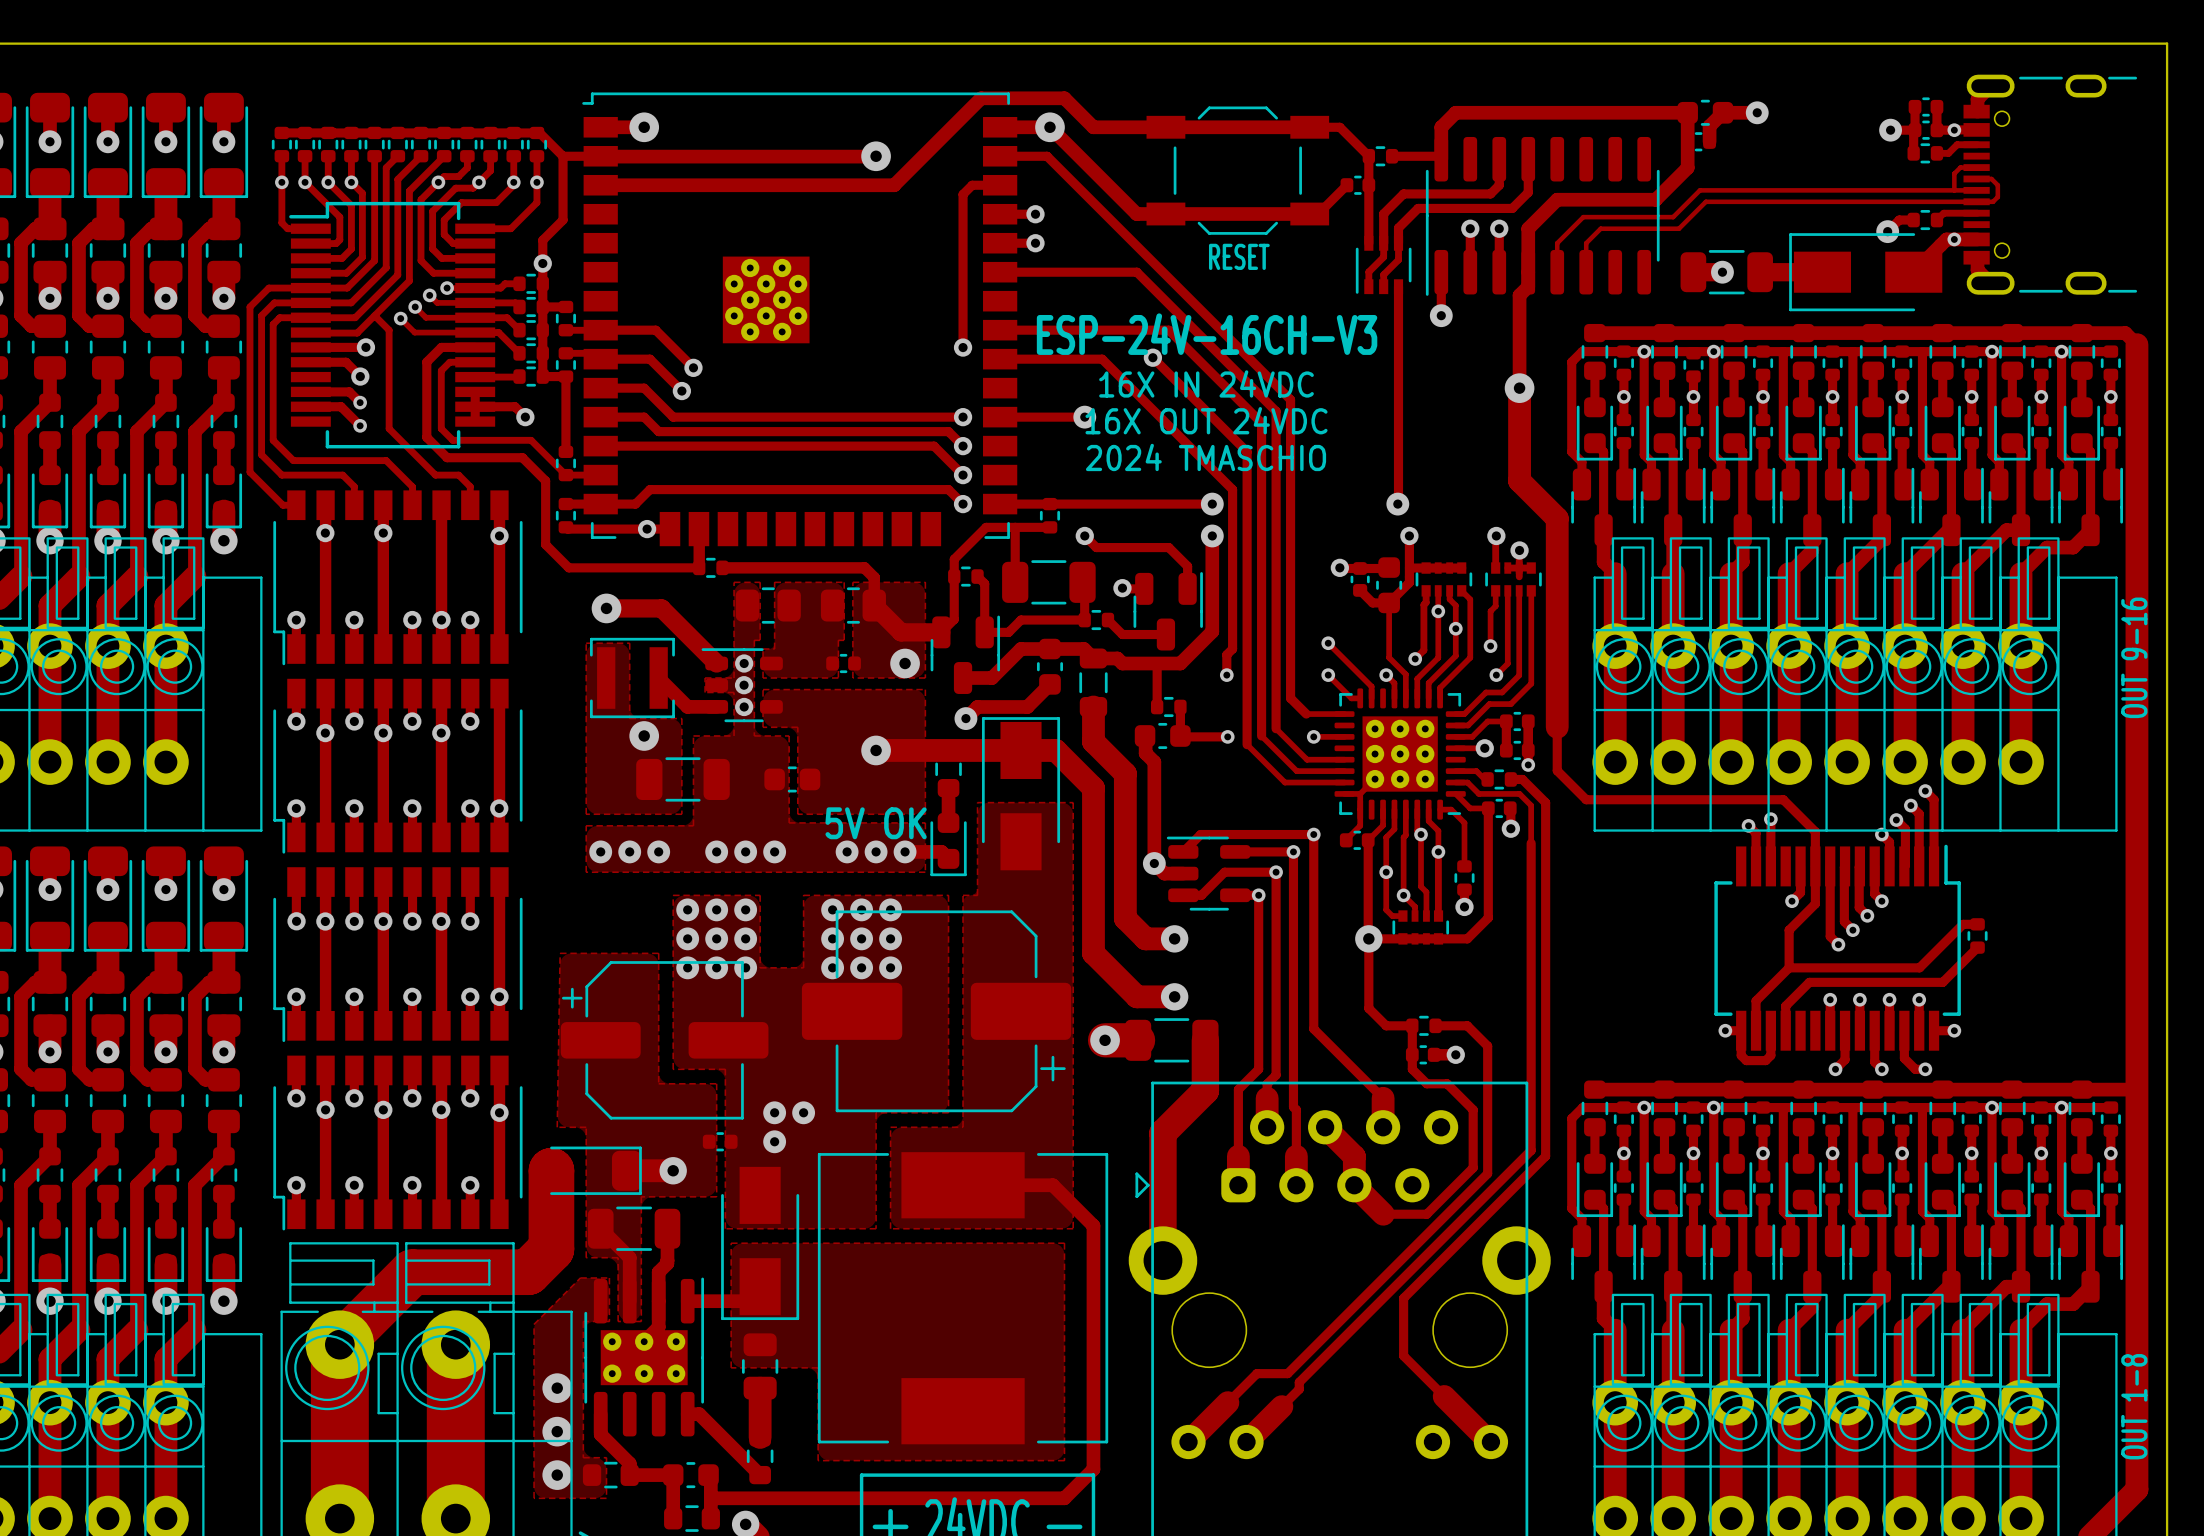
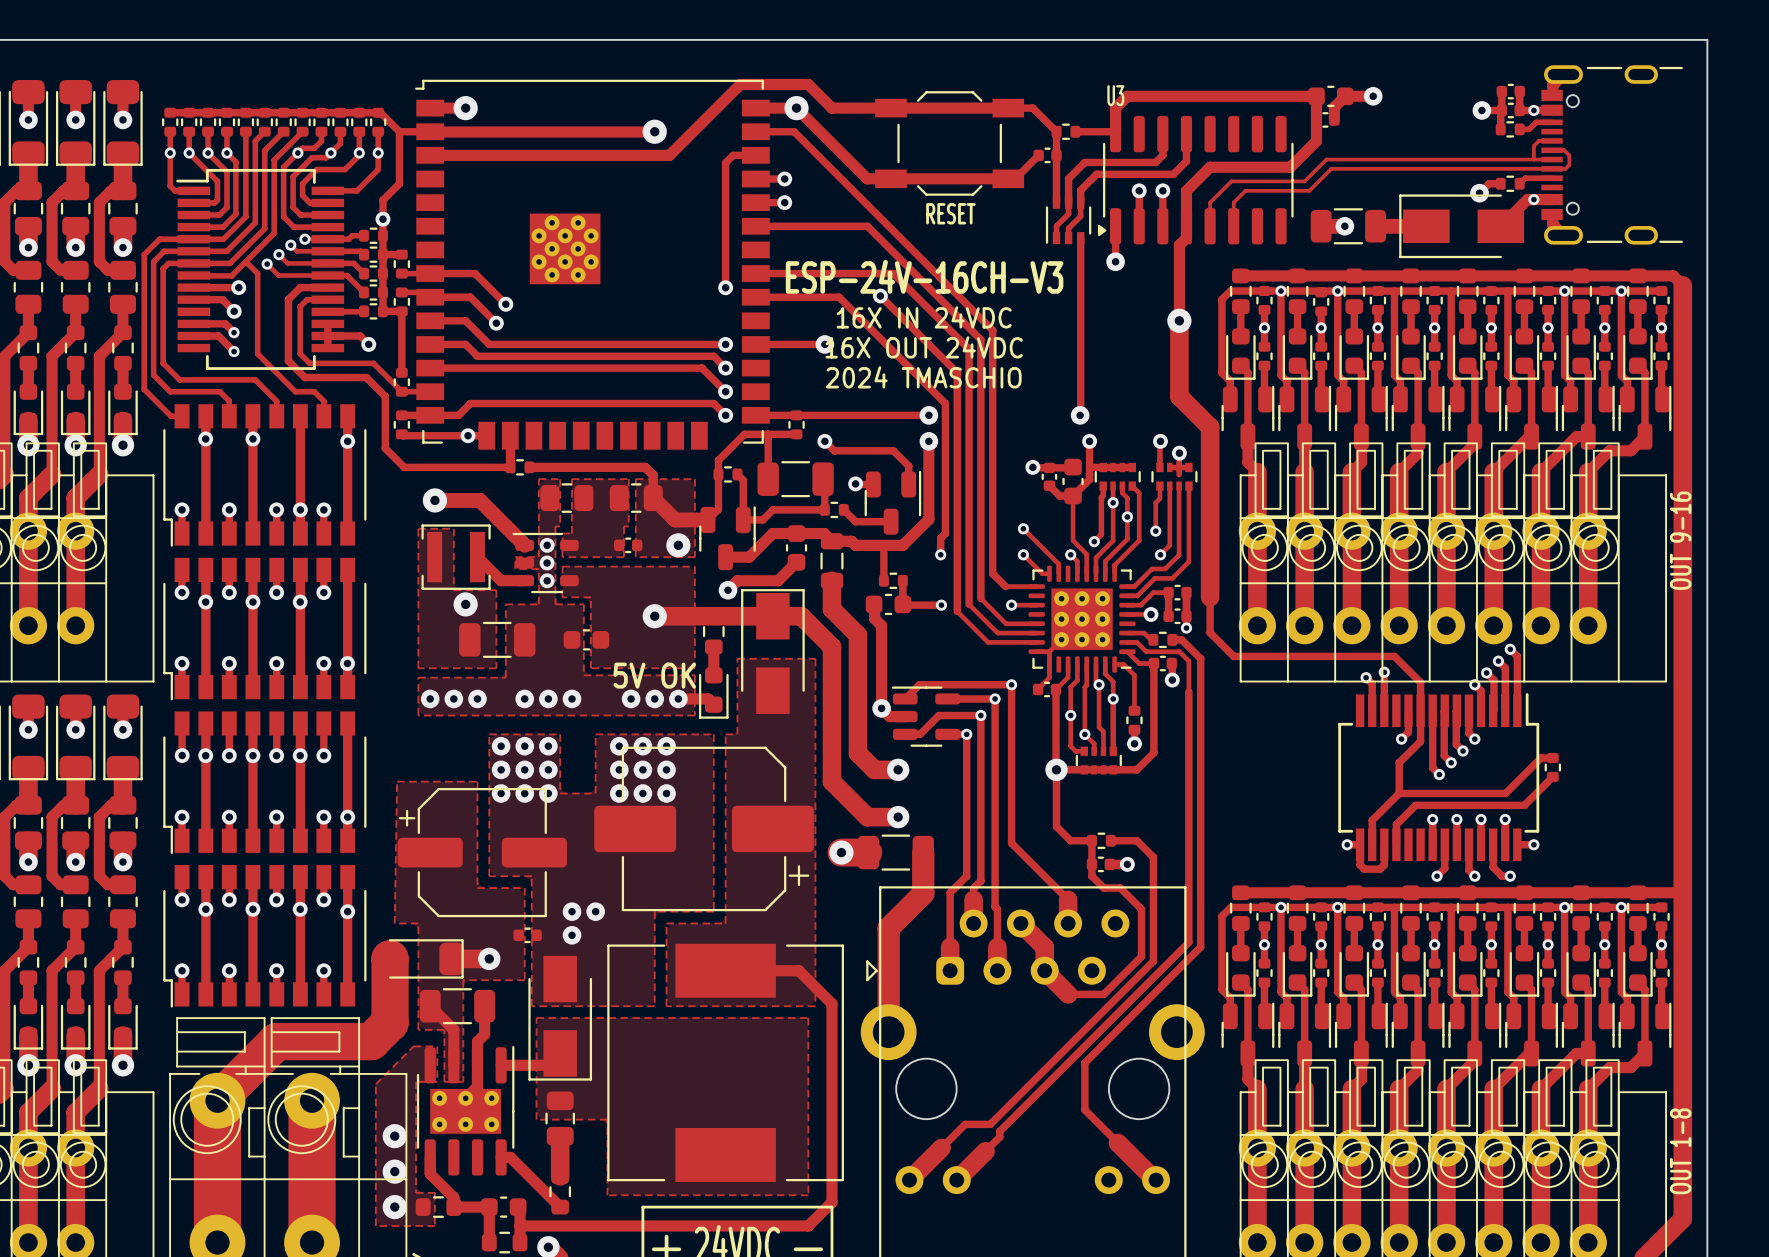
U3: none -> (1195, 180)
part: (1542, 216) -> none

